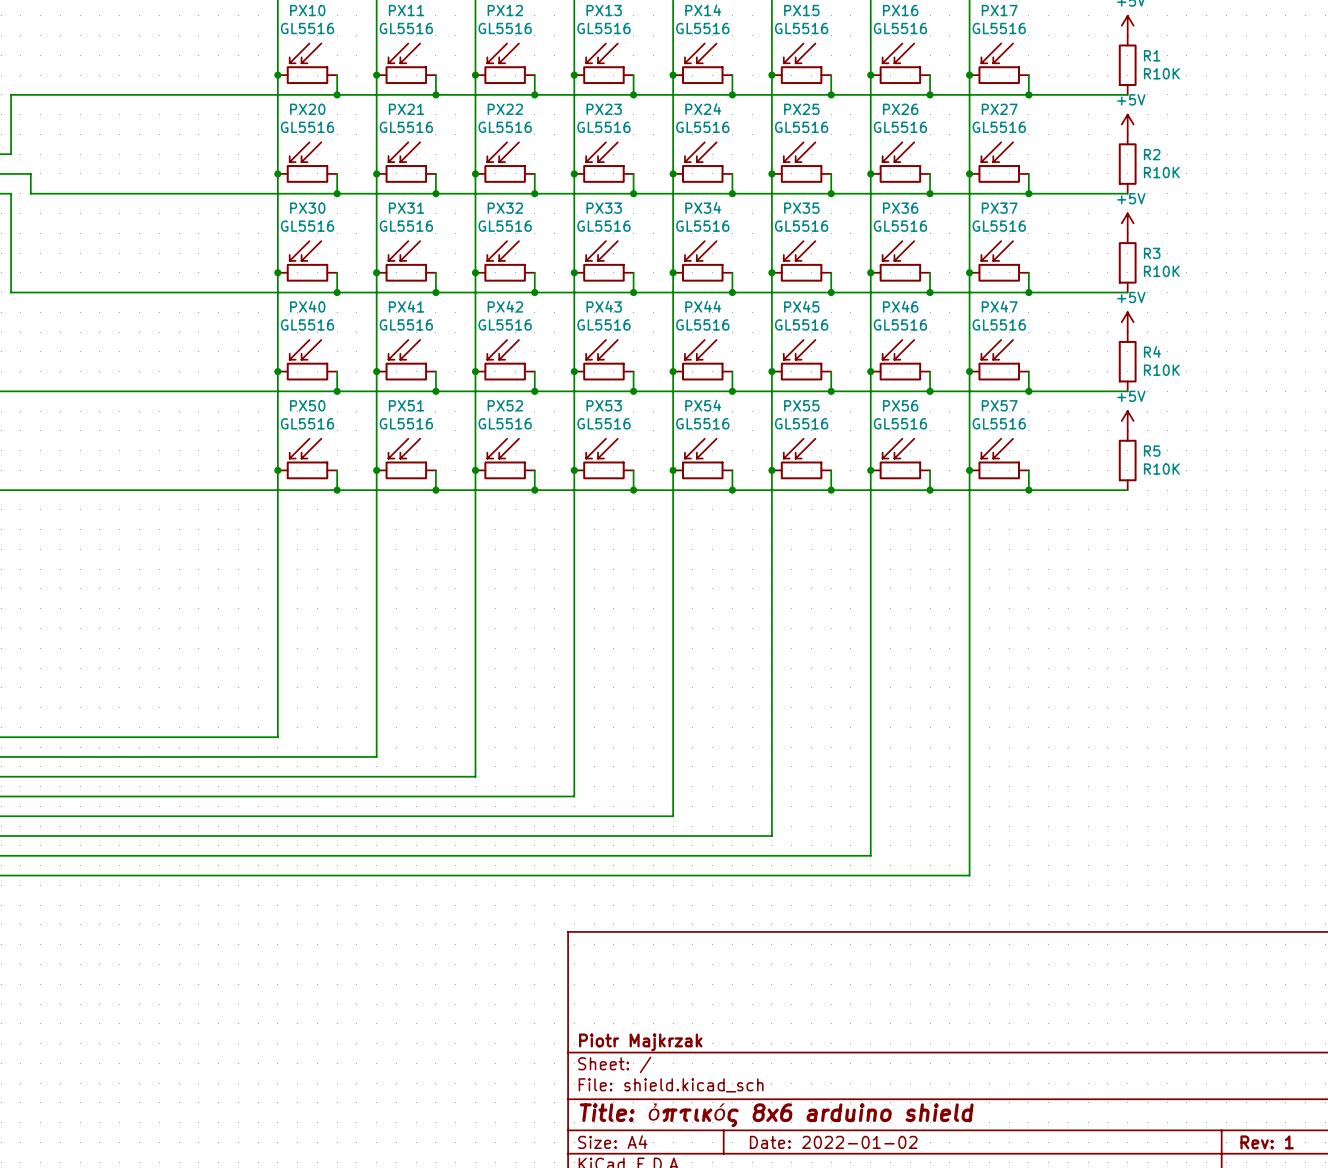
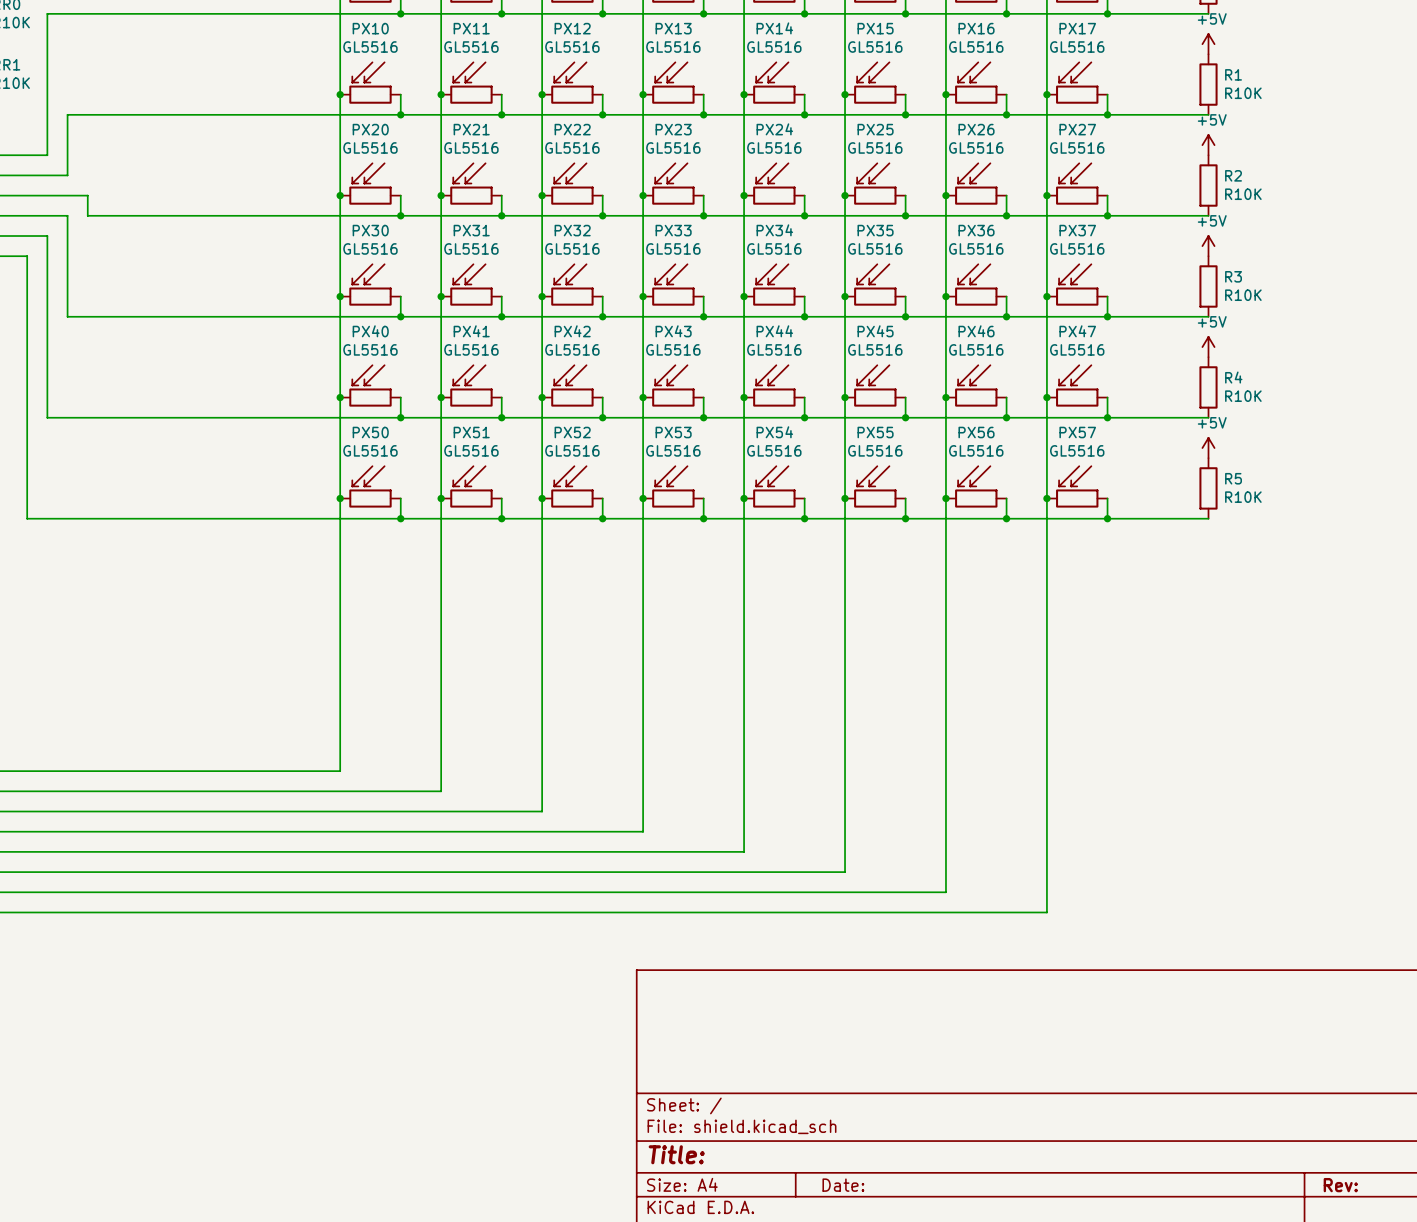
title block: Piotr Majkrzak (640, 1042) -> none
title block: Title: ὀπτικός 8x6 arduino shield (776, 1114) -> Title: (676, 1154)
title block: Date: 2022-01-02 (833, 1142) -> Date: (843, 1185)
title block: Rev: 1 (1267, 1142) -> Rev: (1340, 1185)

